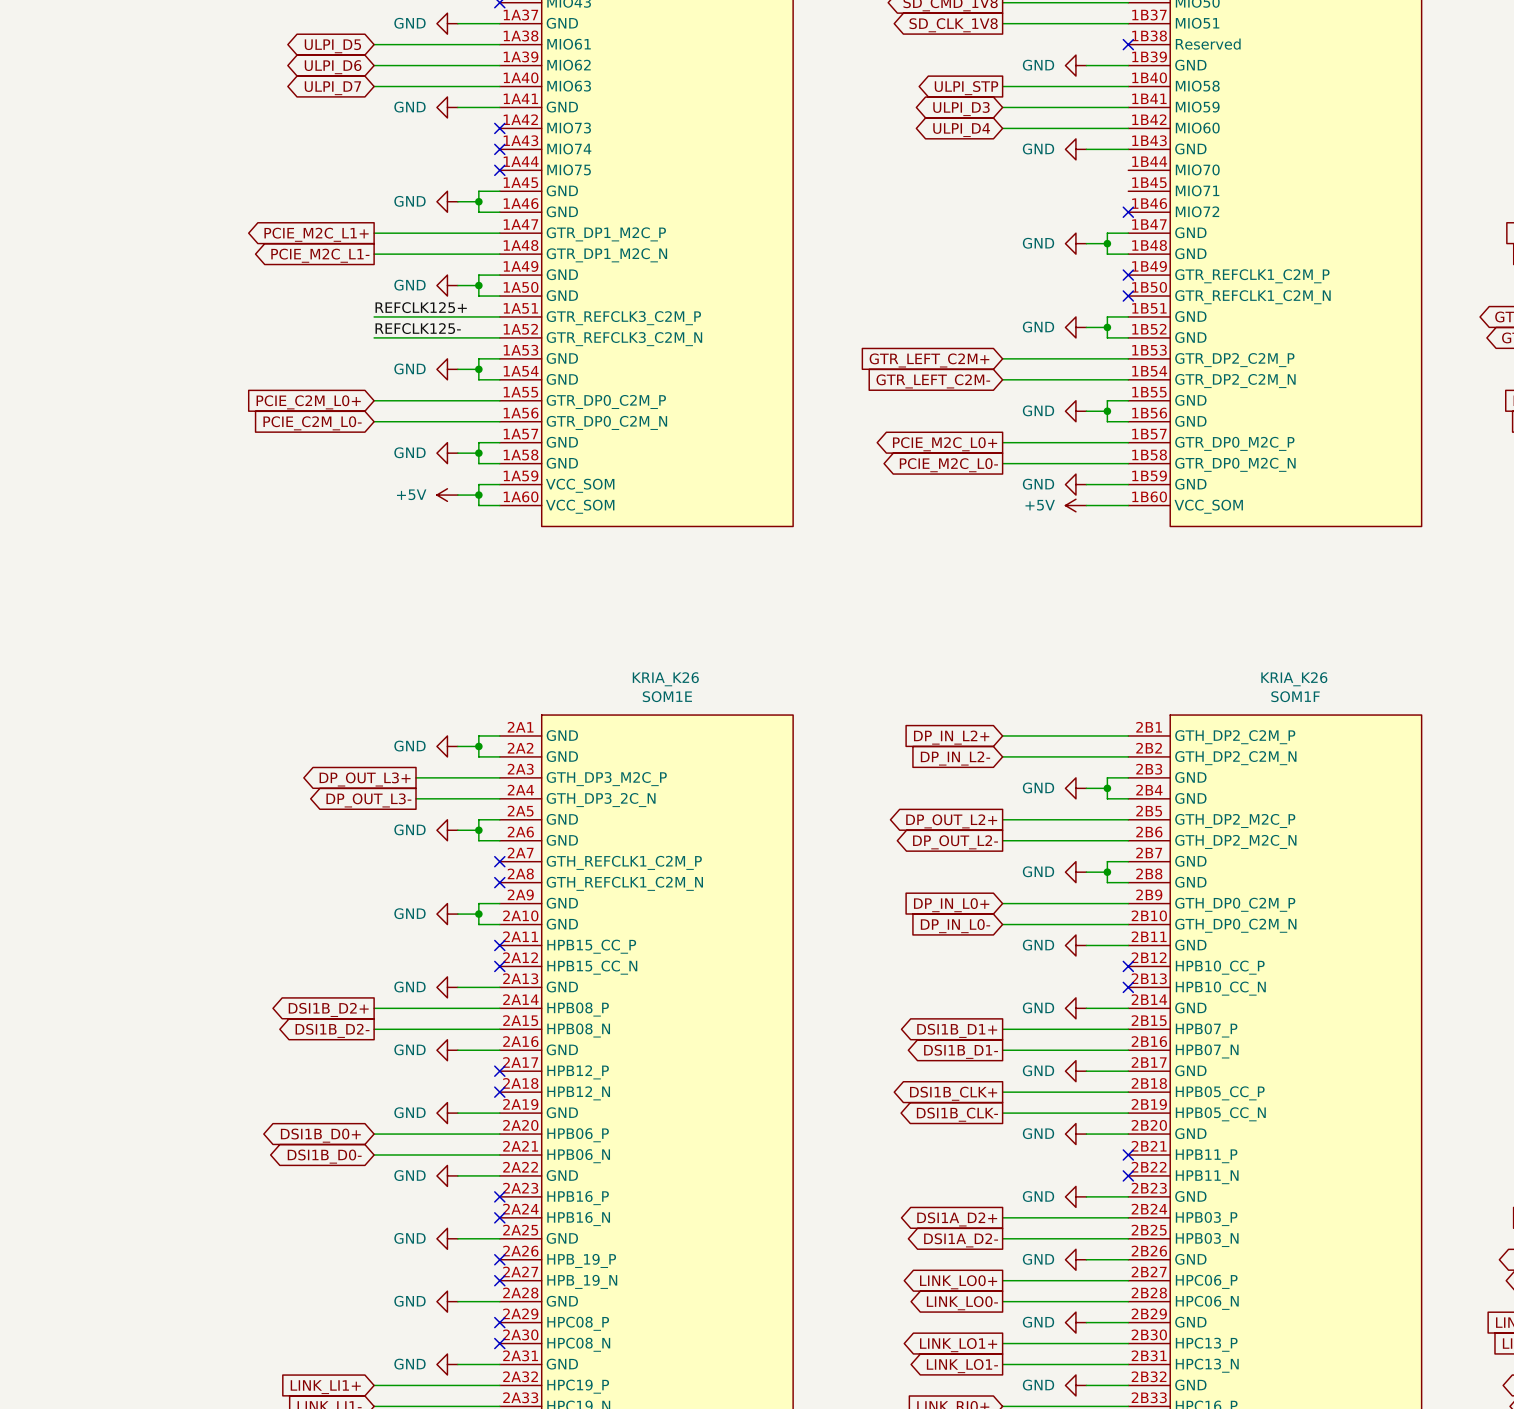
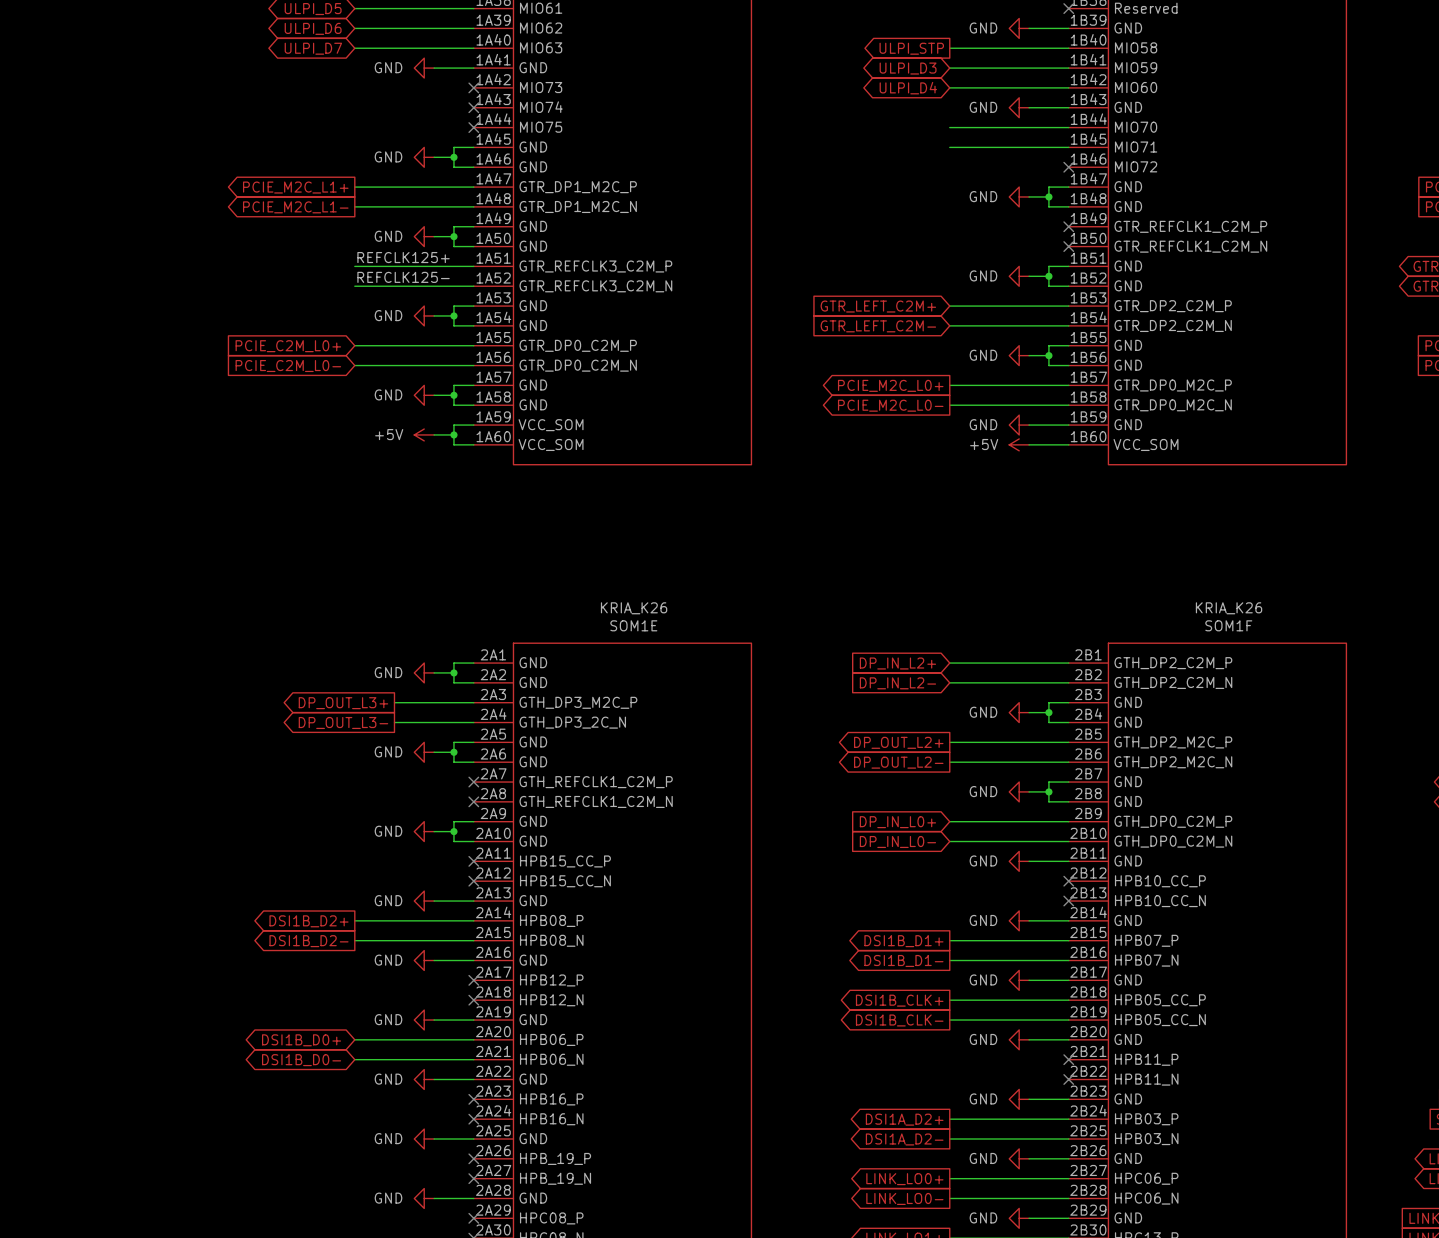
wire: none -> (949, 127) (1068, 127)
wire: none -> (949, 147) (1068, 147)

